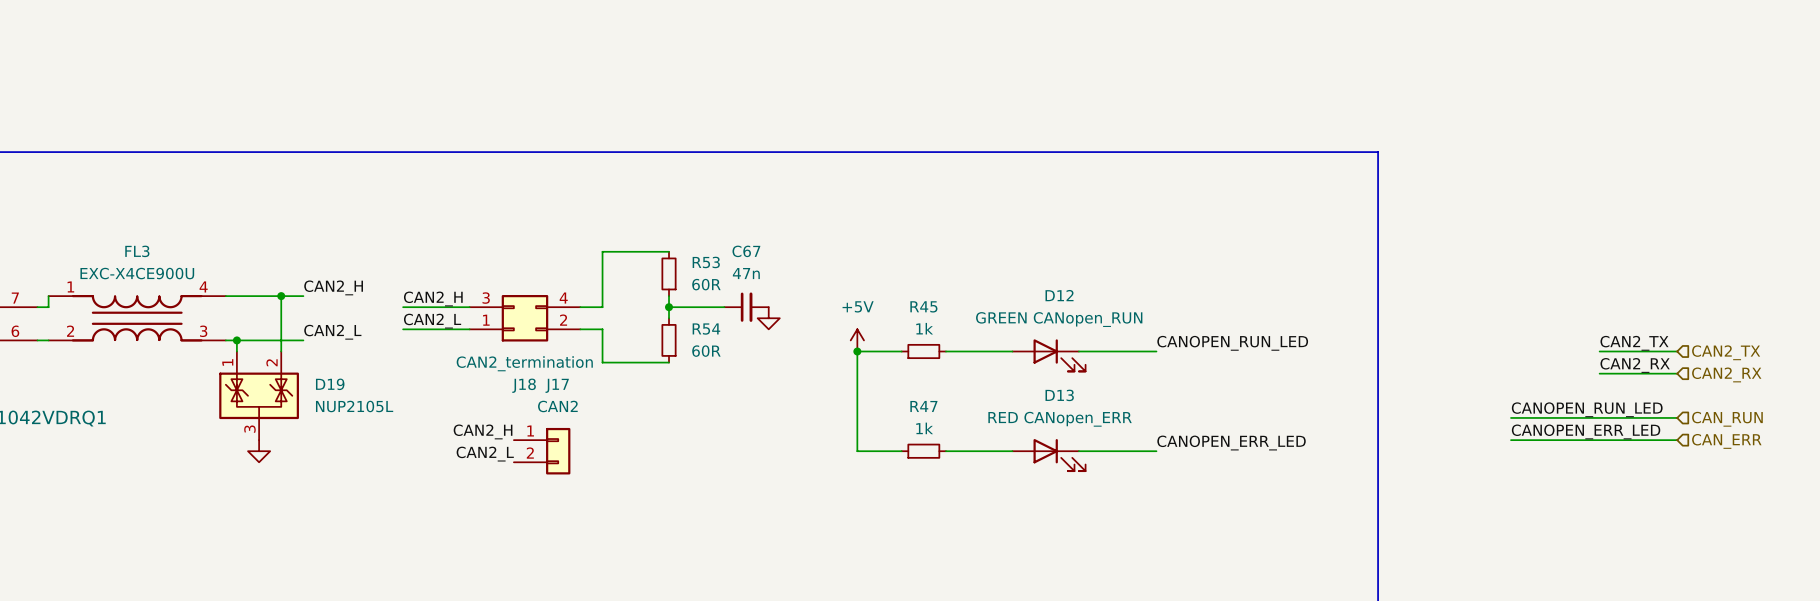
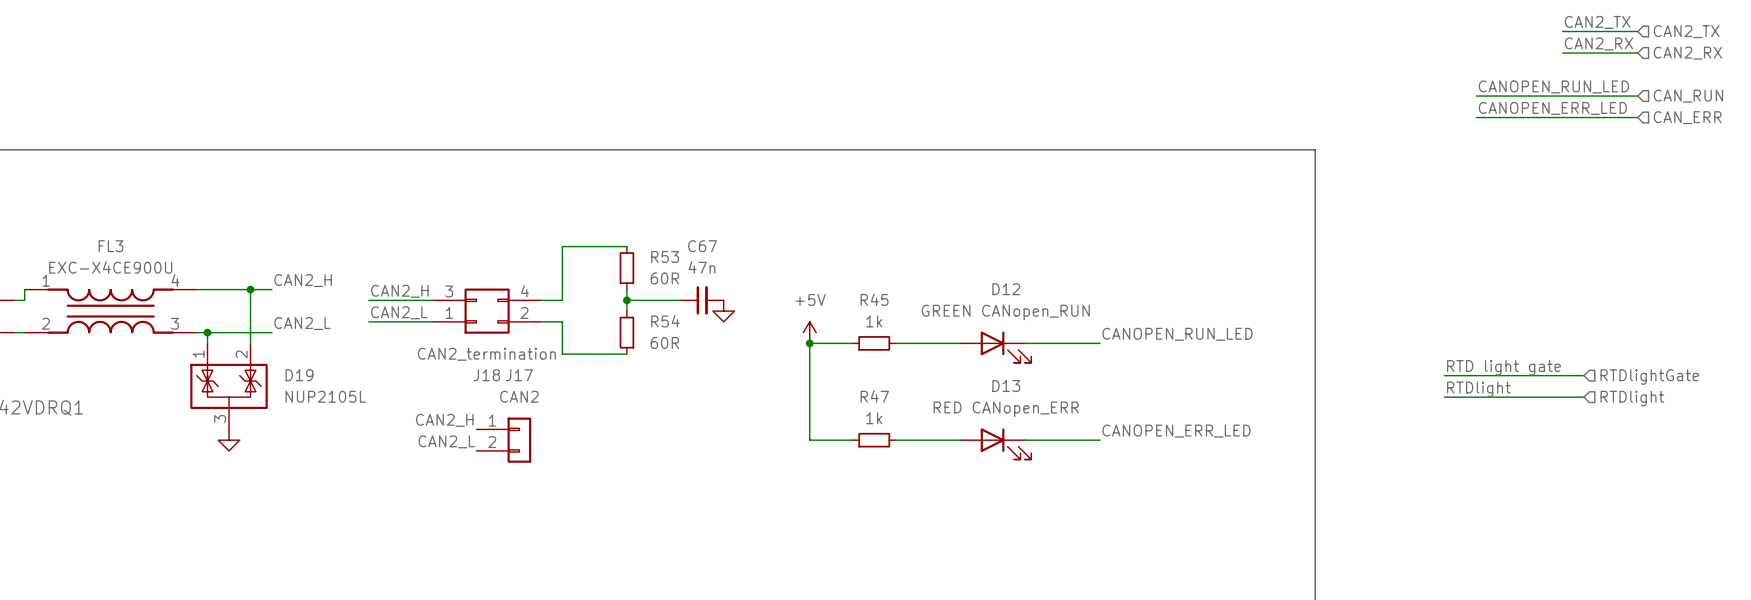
label: none -> CAN2_TX (1597, 22)
wire: none -> (1562, 31) (1637, 31)
hierarchical label: none -> CAN2_TX (1686, 31)
label: none -> CAN2_RX (1598, 43)
wire: none -> (1562, 53) (1637, 53)
hierarchical label: none -> CAN2_RX (1687, 53)
label: none -> CANOPEN_RUN_LED (1553, 86)
wire: none -> (1476, 96) (1637, 96)
hierarchical label: none -> CAN_RUN (1688, 96)
label: none -> CANOPEN_ERR_LED (1552, 108)
wire: none -> (1476, 117) (1637, 117)
hierarchical label: none -> CAN_ERR (1687, 117)
label: CAN2_TX (1634, 343) -> none
wire: (1599, 351) (1677, 351) -> none
hierarchical label: CAN2_TX (1726, 352) -> none
label: CAN2_RX (1635, 365) -> none
wire: (1599, 373) (1677, 373) -> none
hierarchical label: CAN2_RX (1726, 374) -> none
label: none -> RTD light gate (1503, 367)
wire: none -> (1444, 375) (1584, 375)
hierarchical label: none -> RTDlightGate (1649, 377)
label: none -> RTDlight (1478, 389)
wire: none -> (1444, 397) (1584, 397)
hierarchical label: none -> RTDlight (1632, 398)
label: CANOPEN_RUN_LED (1587, 409) -> none
wire: (1511, 417) (1677, 417) -> none
hierarchical label: CAN_RUN (1727, 419) -> none
label: CANOPEN_ERR_LED (1586, 431) -> none
wire: (1511, 440) (1677, 440) -> none
hierarchical label: CAN_ERR (1726, 441) -> none

